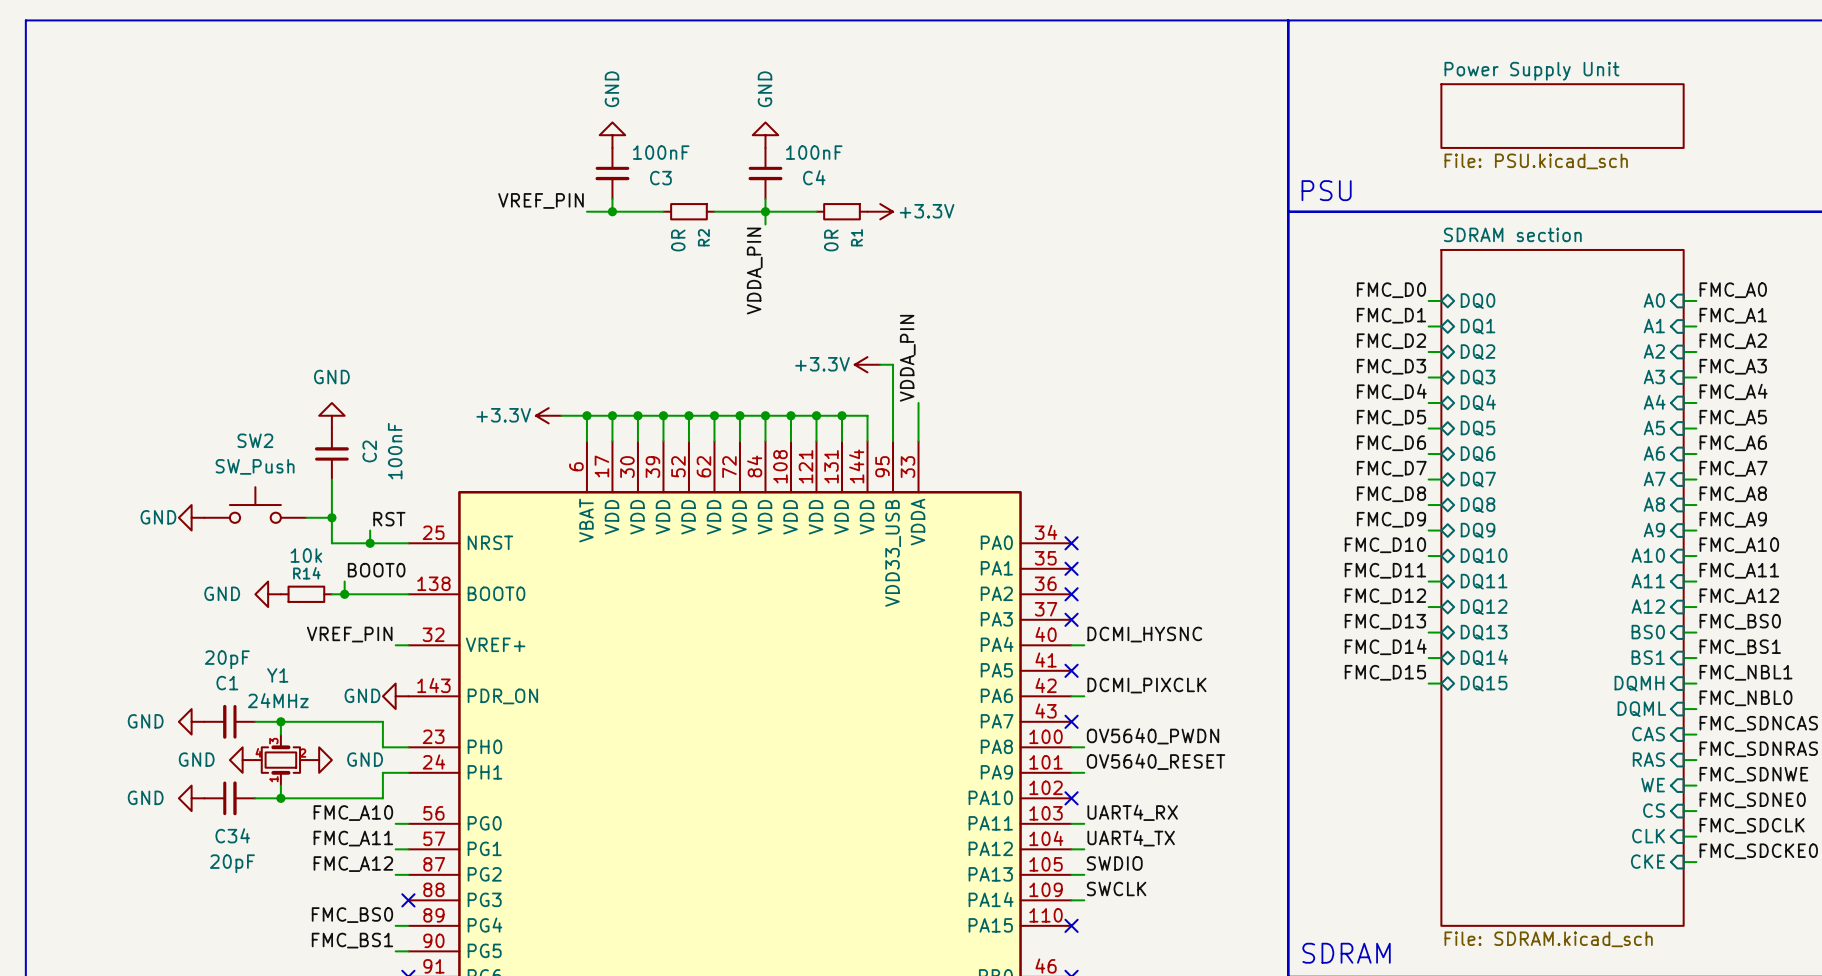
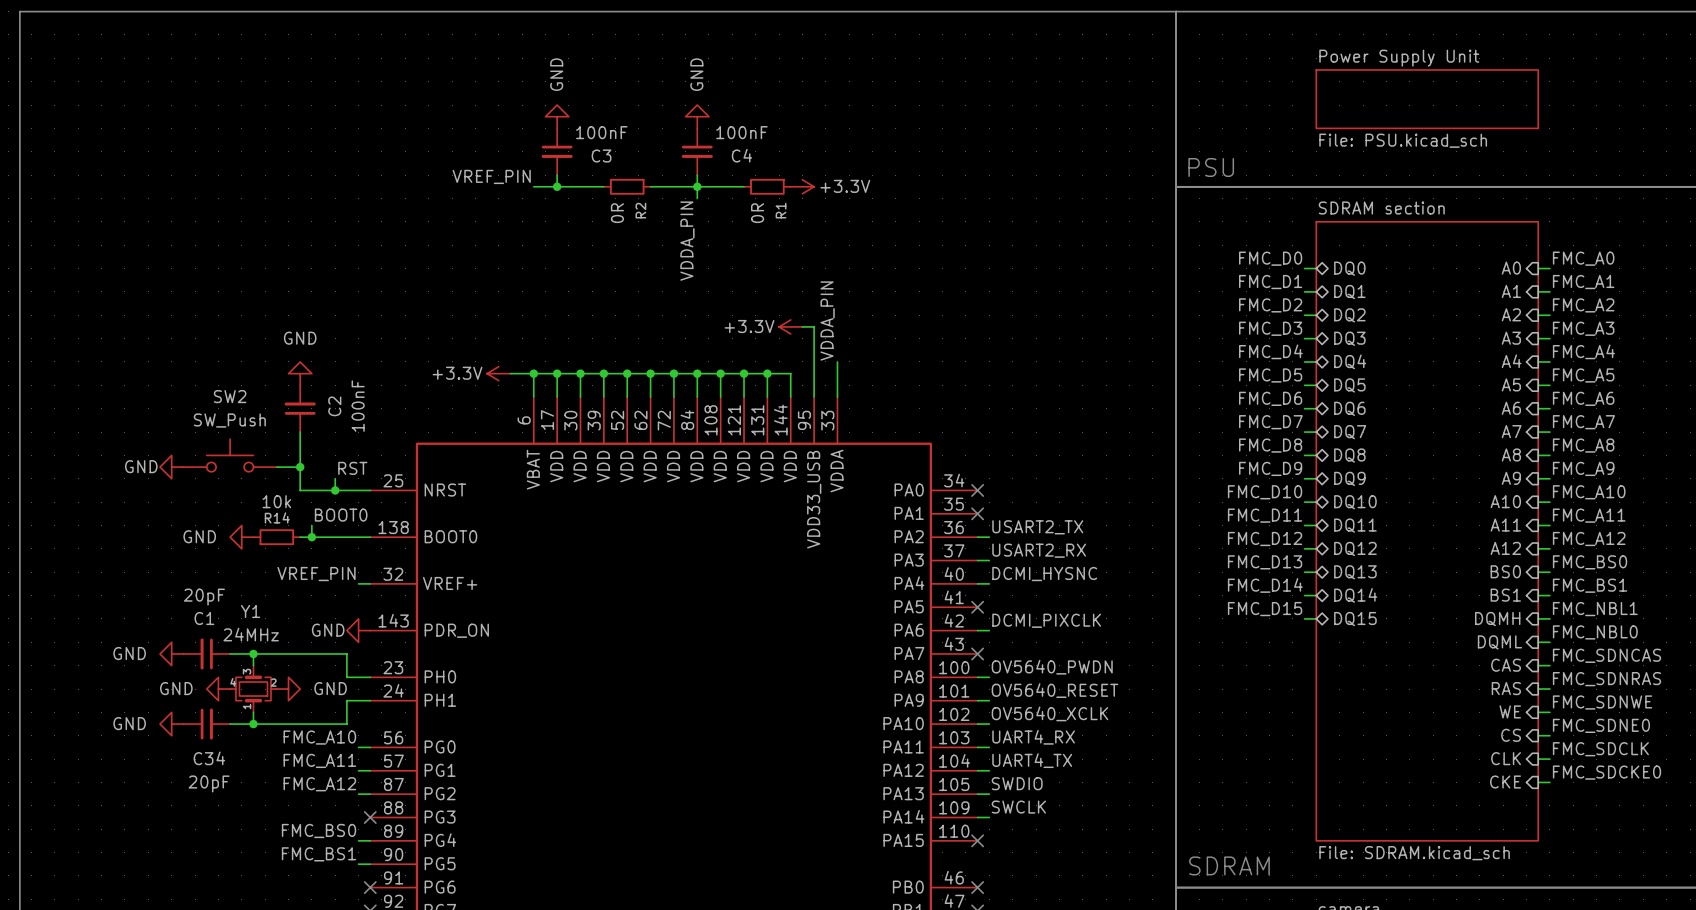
label: none -> USART2_TX (1037, 527)
wire: none -> (977, 537) (989, 537)
no-connect mark: (1071, 594) -> none
label: none -> USART2_RX (1039, 550)
wire: none -> (977, 560) (989, 560)
no-connect mark: (1071, 619) -> none
label: none -> OV5640_XCLK (1049, 713)
wire: none -> (977, 724) (989, 724)
no-connect mark: (1071, 798) -> none

